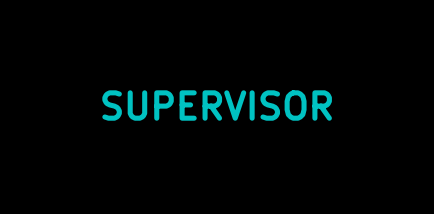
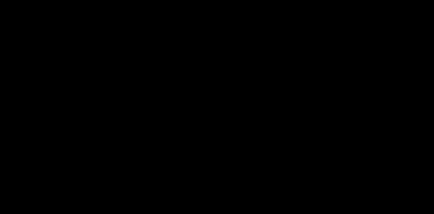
text: SUPERVISOR (217, 105) -> none

